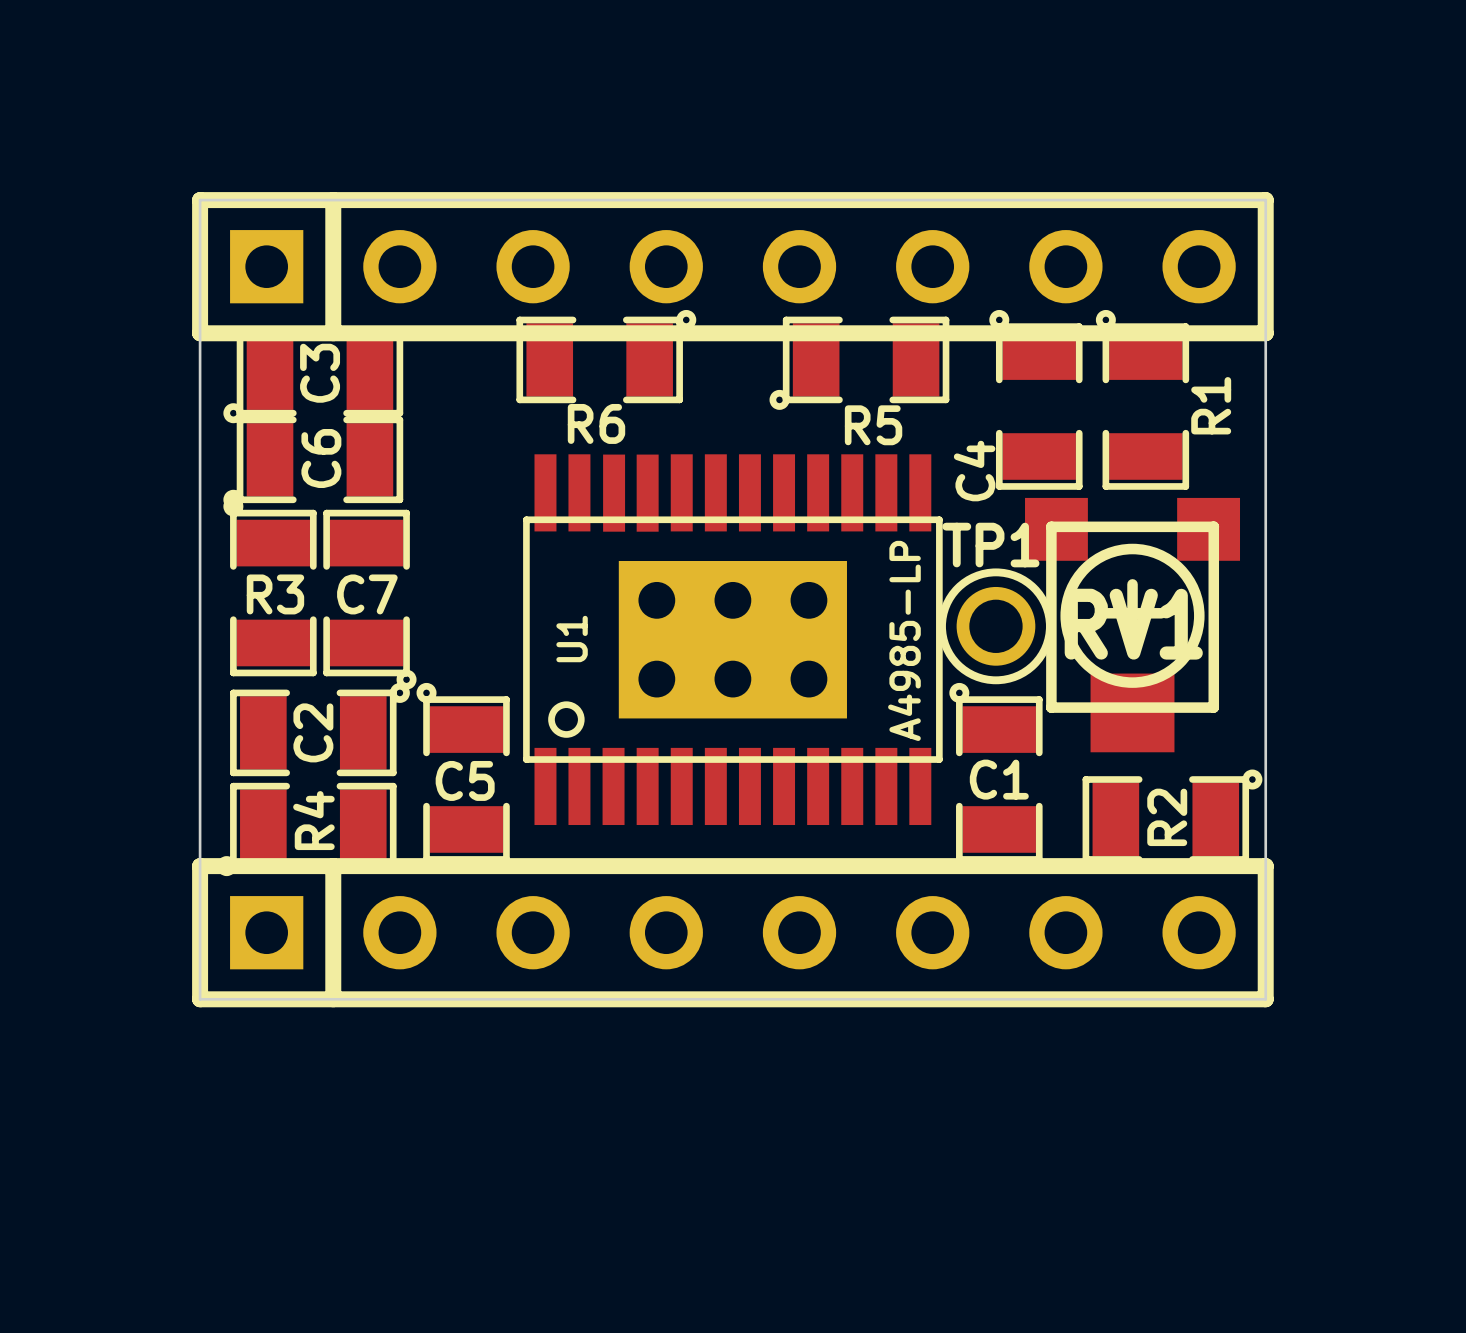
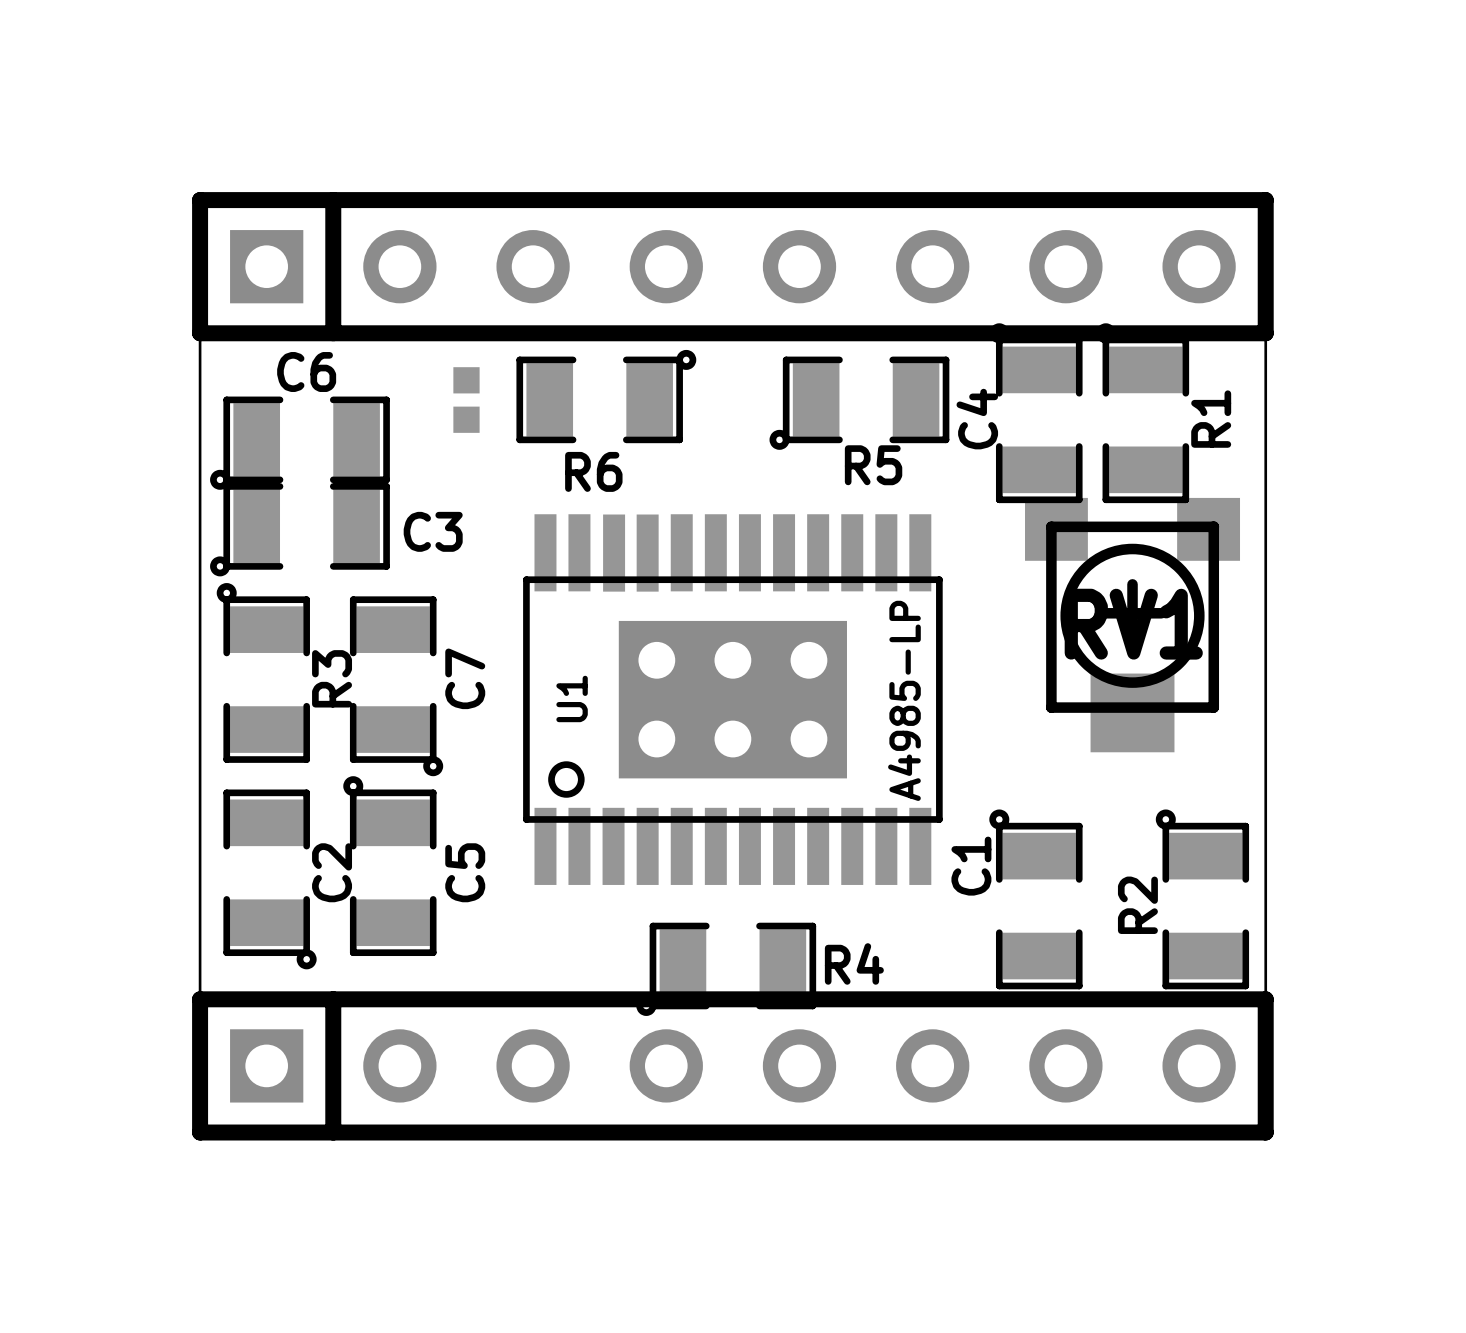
R6 position: (606, 356) -> (606, 396)
R5 position: (859, 363) -> (859, 403)
C3 name rotation: 0° (320, 373) -> 90° clockwise (433, 531)
C3 name position: C3 (320, 373) -> C3 (433, 531)
C3 position: (313, 376) -> (299, 529)
C4 position: (1035, 399) -> (1035, 413)
R1 position: (1142, 399) -> (1142, 413)
part: none -> (466, 400)
R6 name position: R6 (596, 423) -> R6 (593, 471)
C6 name rotation: 0° (321, 458) -> 90° clockwise (306, 372)
C6 position: (313, 463) -> (299, 443)
C4 name position: C4 (974, 471) -> C4 (977, 419)
R3 position: (270, 586) -> (263, 672)
R3 name rotation: 0° (275, 594) -> 90° counterclockwise (332, 678)
C7 name rotation: 0° (367, 594) -> 90° counterclockwise (465, 678)
C7 position: (369, 599) -> (396, 686)
TP1: (995, 626) -> none
U1 position: (732, 639) -> (732, 699)
C2 rotation: 0° (319, 729) -> 90° clockwise (270, 879)
C2 position: (319, 729) -> (270, 879)
C5 position: (463, 772) -> (389, 866)
C1 position: (995, 772) -> (1035, 899)
C1 name rotation: 0° (999, 779) -> 90° counterclockwise (971, 866)
C5 name rotation: 0° (465, 780) -> 90° counterclockwise (465, 872)
R2 rotation: 0° (1172, 816) -> 90° counterclockwise (1202, 899)
R4 name rotation: 0° (313, 820) -> 90° clockwise (854, 963)
R4 name position: R4 (313, 820) -> R4 (854, 963)
R4 position: (306, 829) -> (726, 969)
part position: (732, 932) -> (732, 1065)

